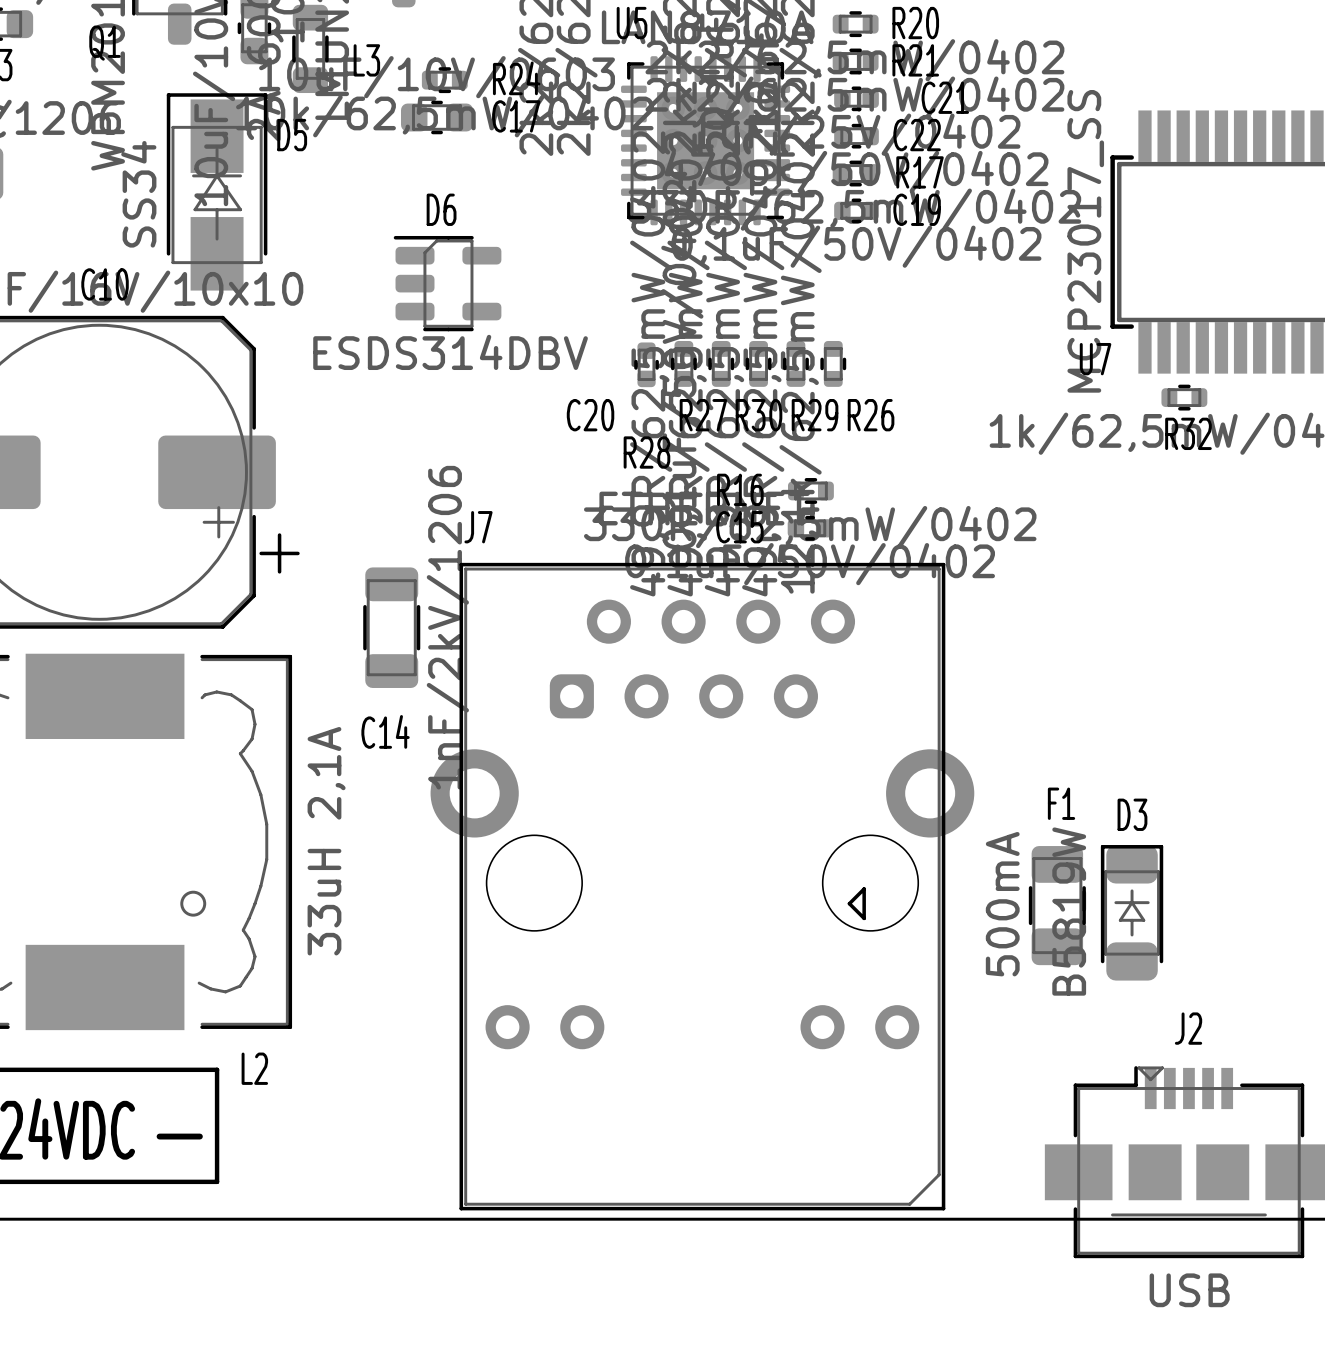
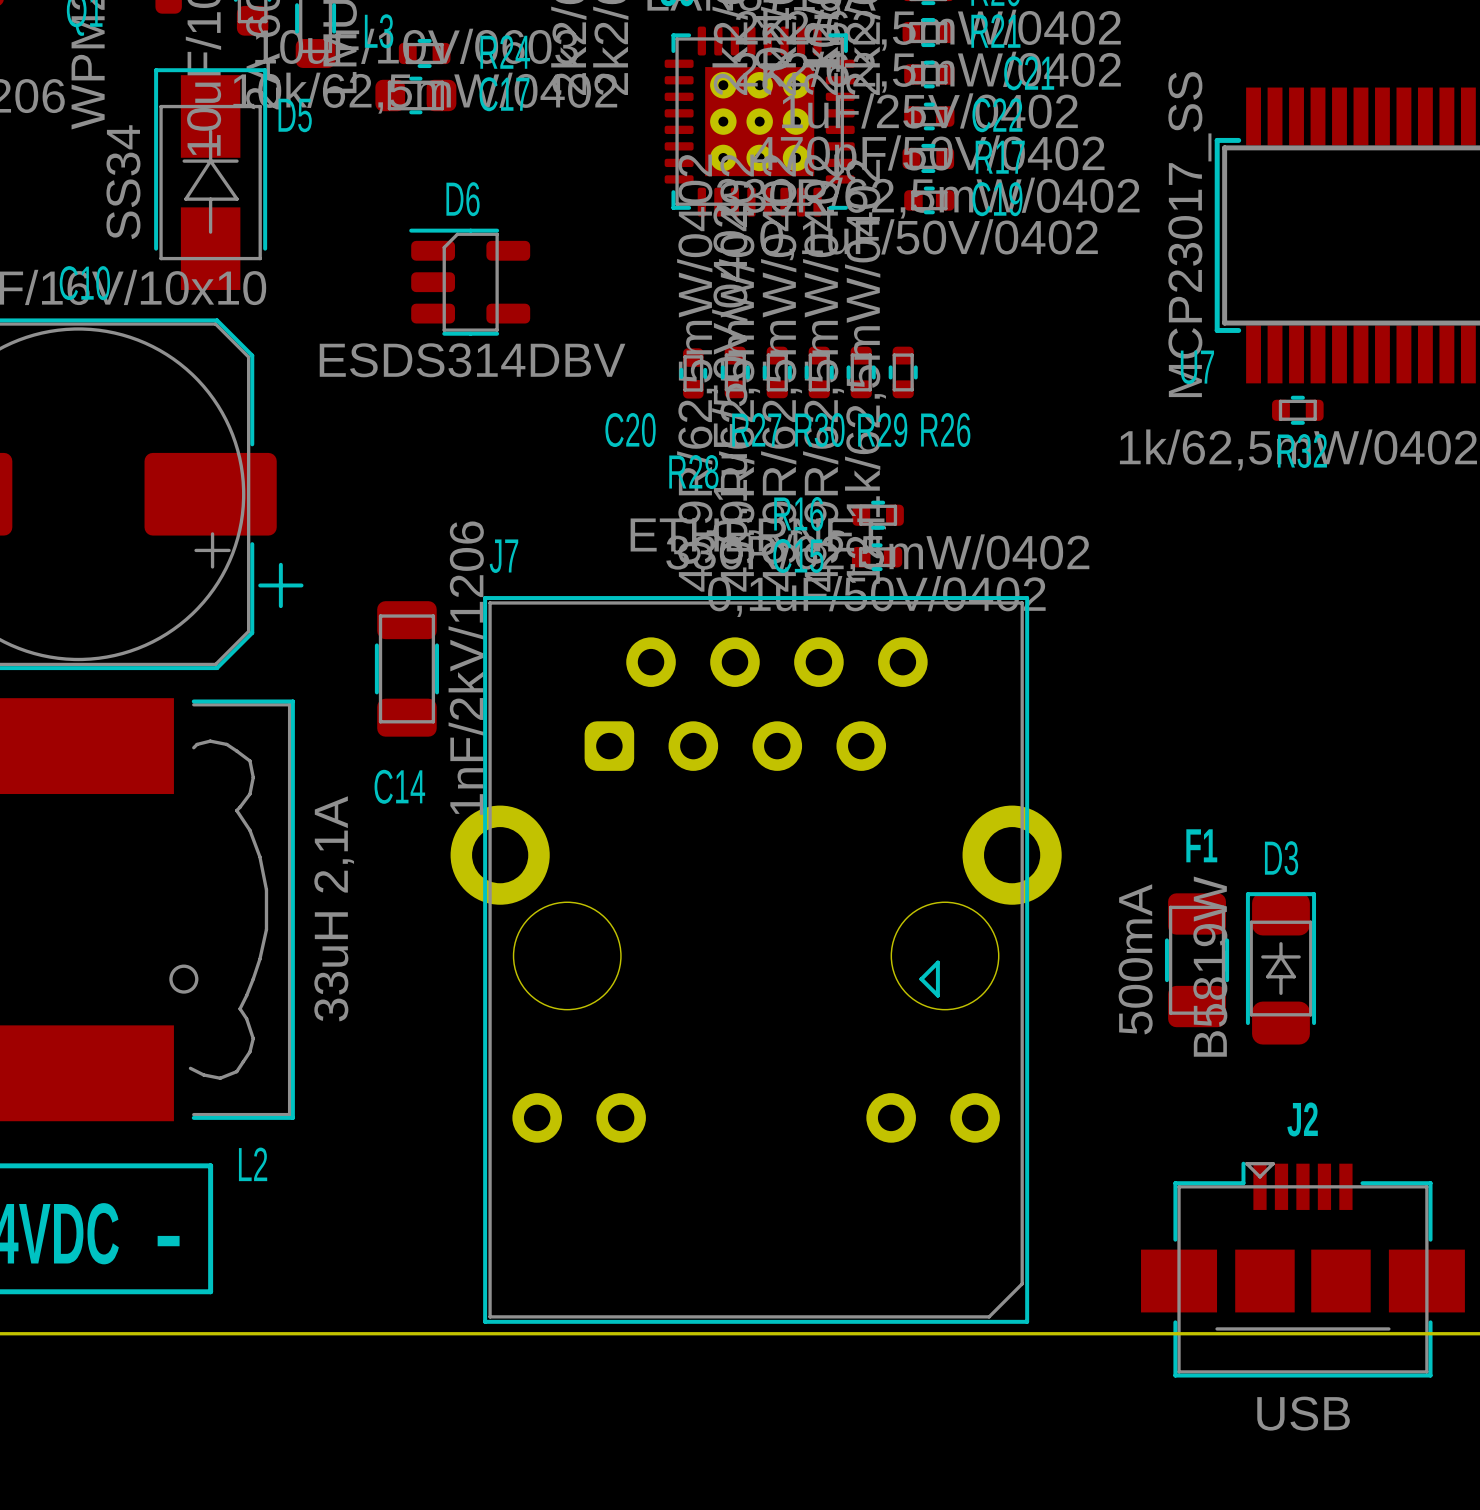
R24 position: (444, 80) -> (424, 53)
C17 position: (437, 117) -> (415, 95)
F1 position: (1057, 905) -> (1197, 960)
D3 position: (1132, 912) -> (1280, 968)

